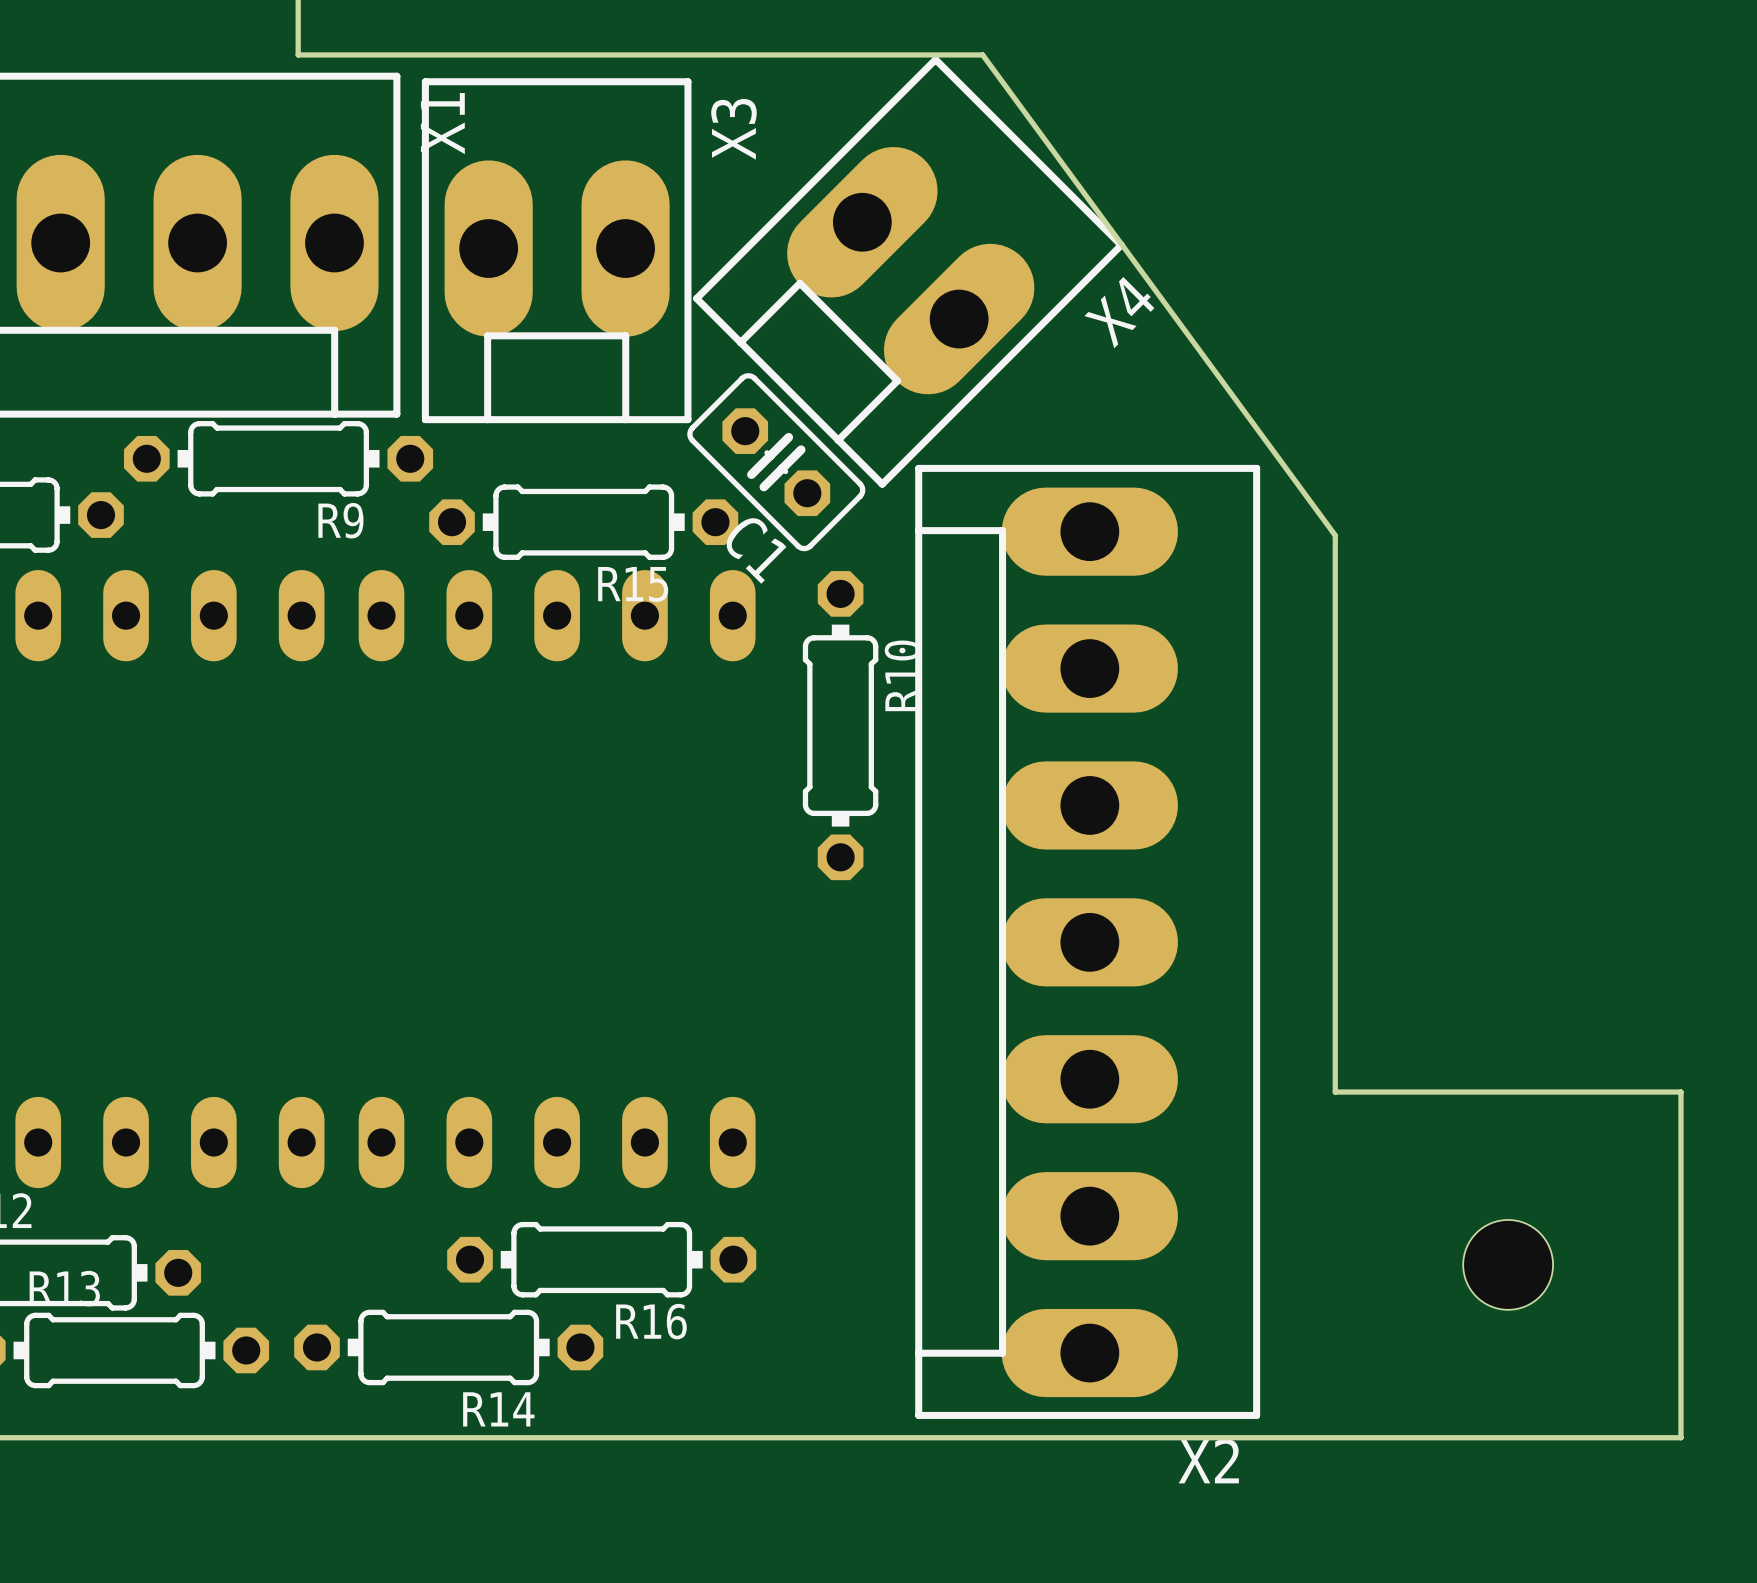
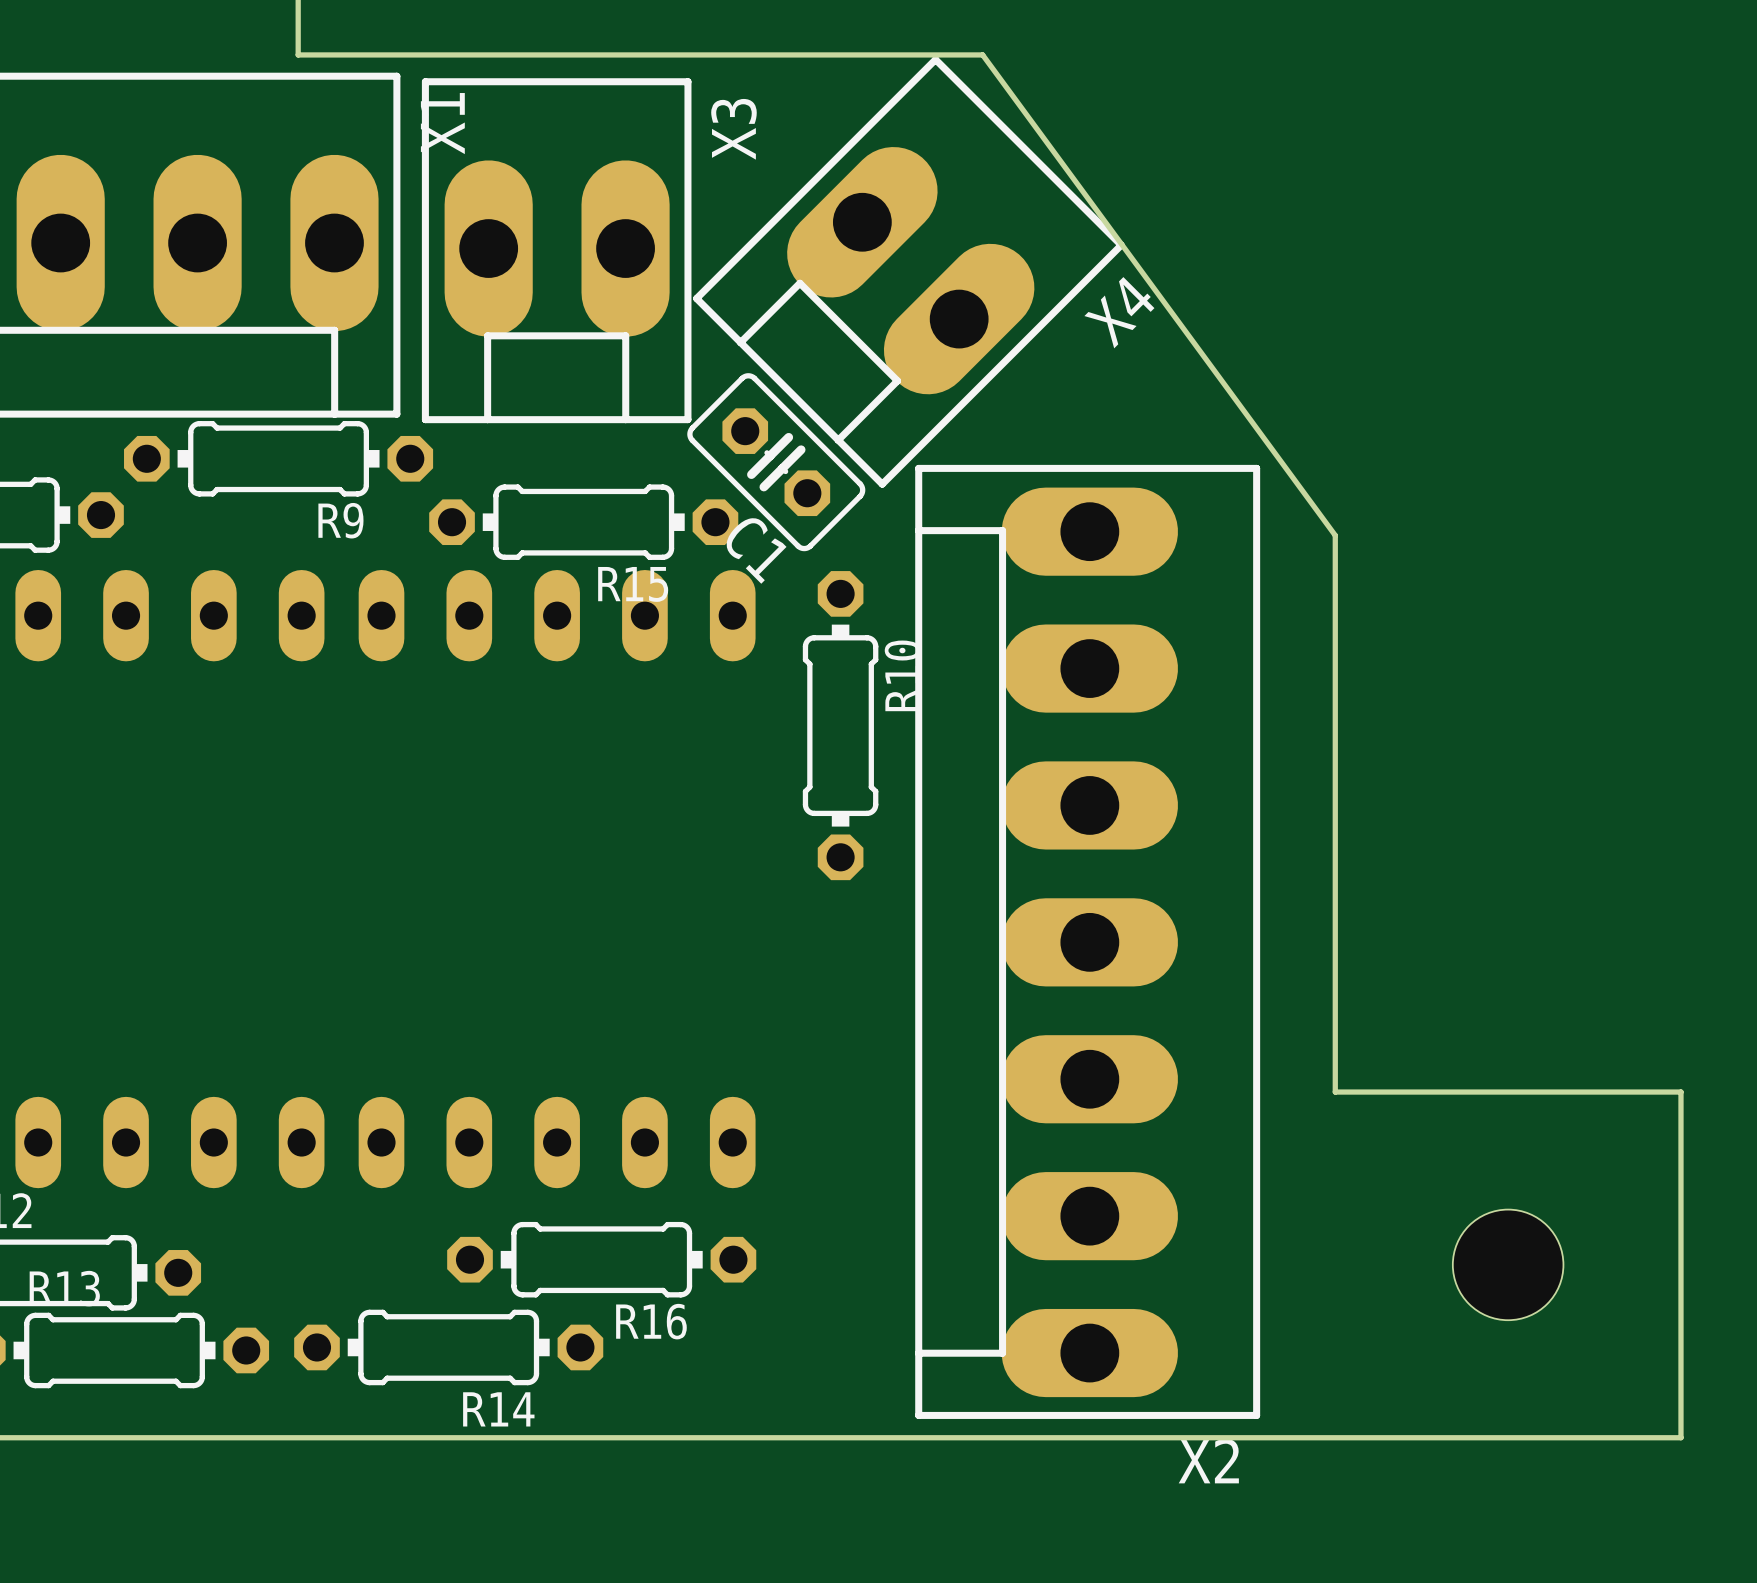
hole size: [1463, 1219, 1554, 1310] -> [1452, 1209, 1564, 1321]

